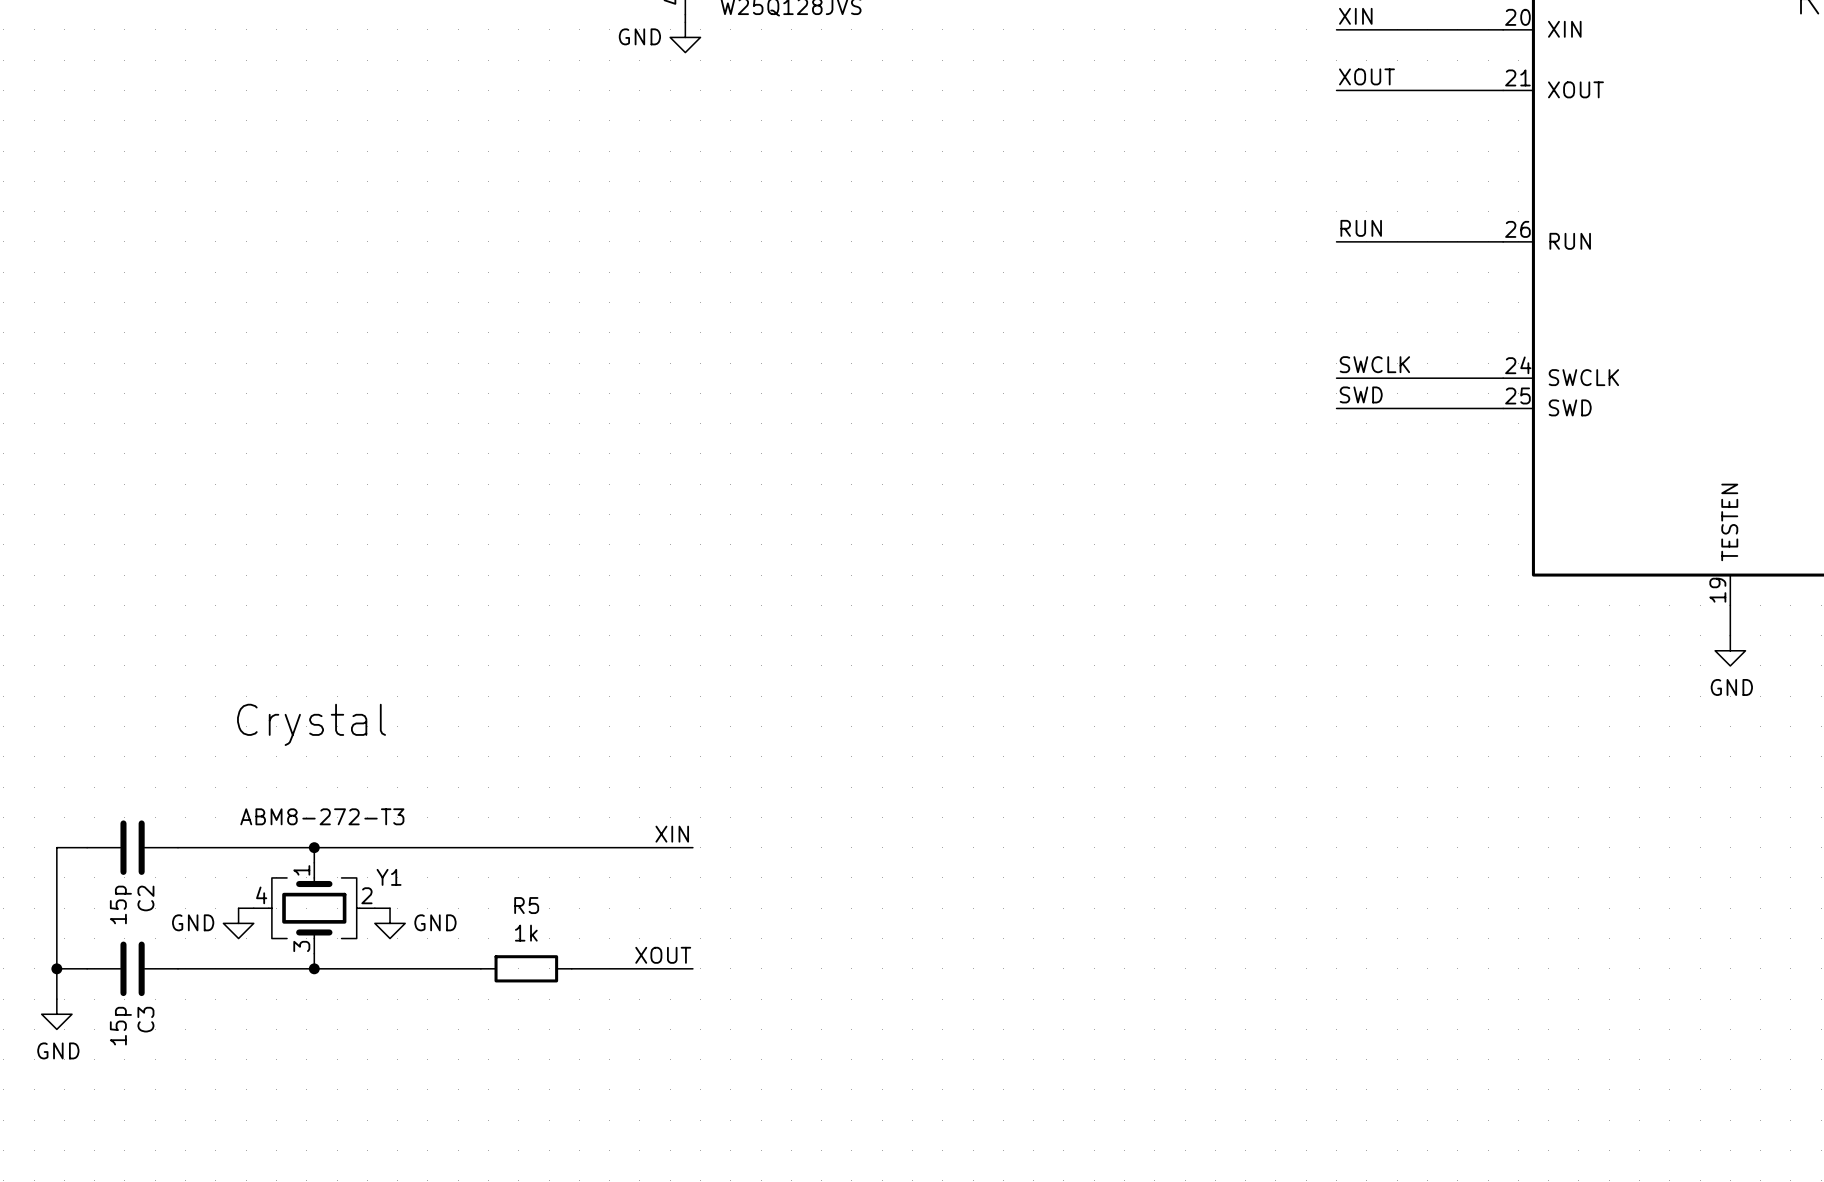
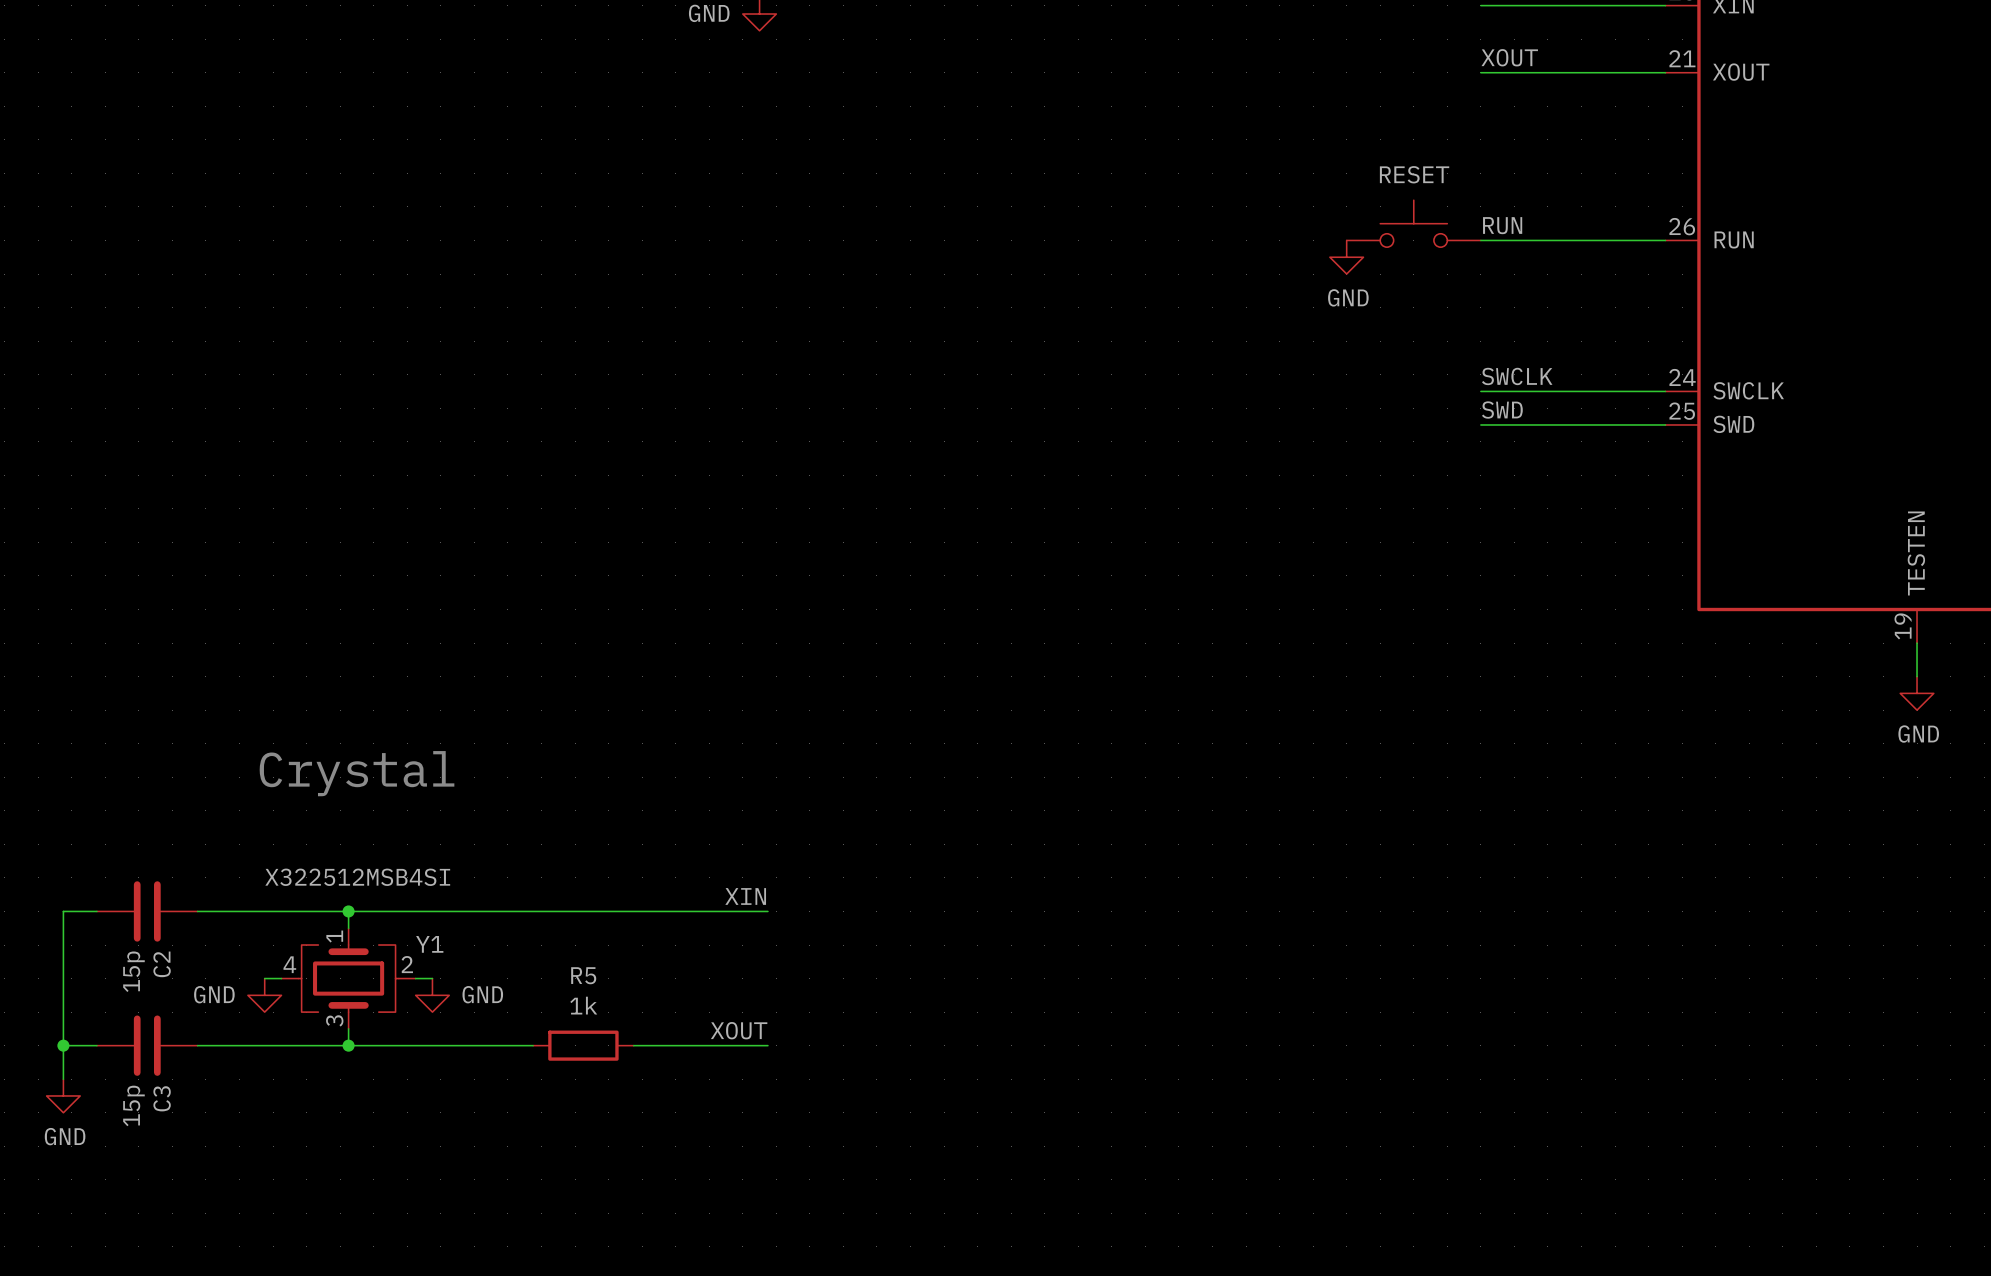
part: none -> RESET (1413, 223)
power symbol: none -> GND (1346, 257)
Y1 value: ABM8-272-T3 (322, 816) -> X322512MSB4SI (357, 877)

